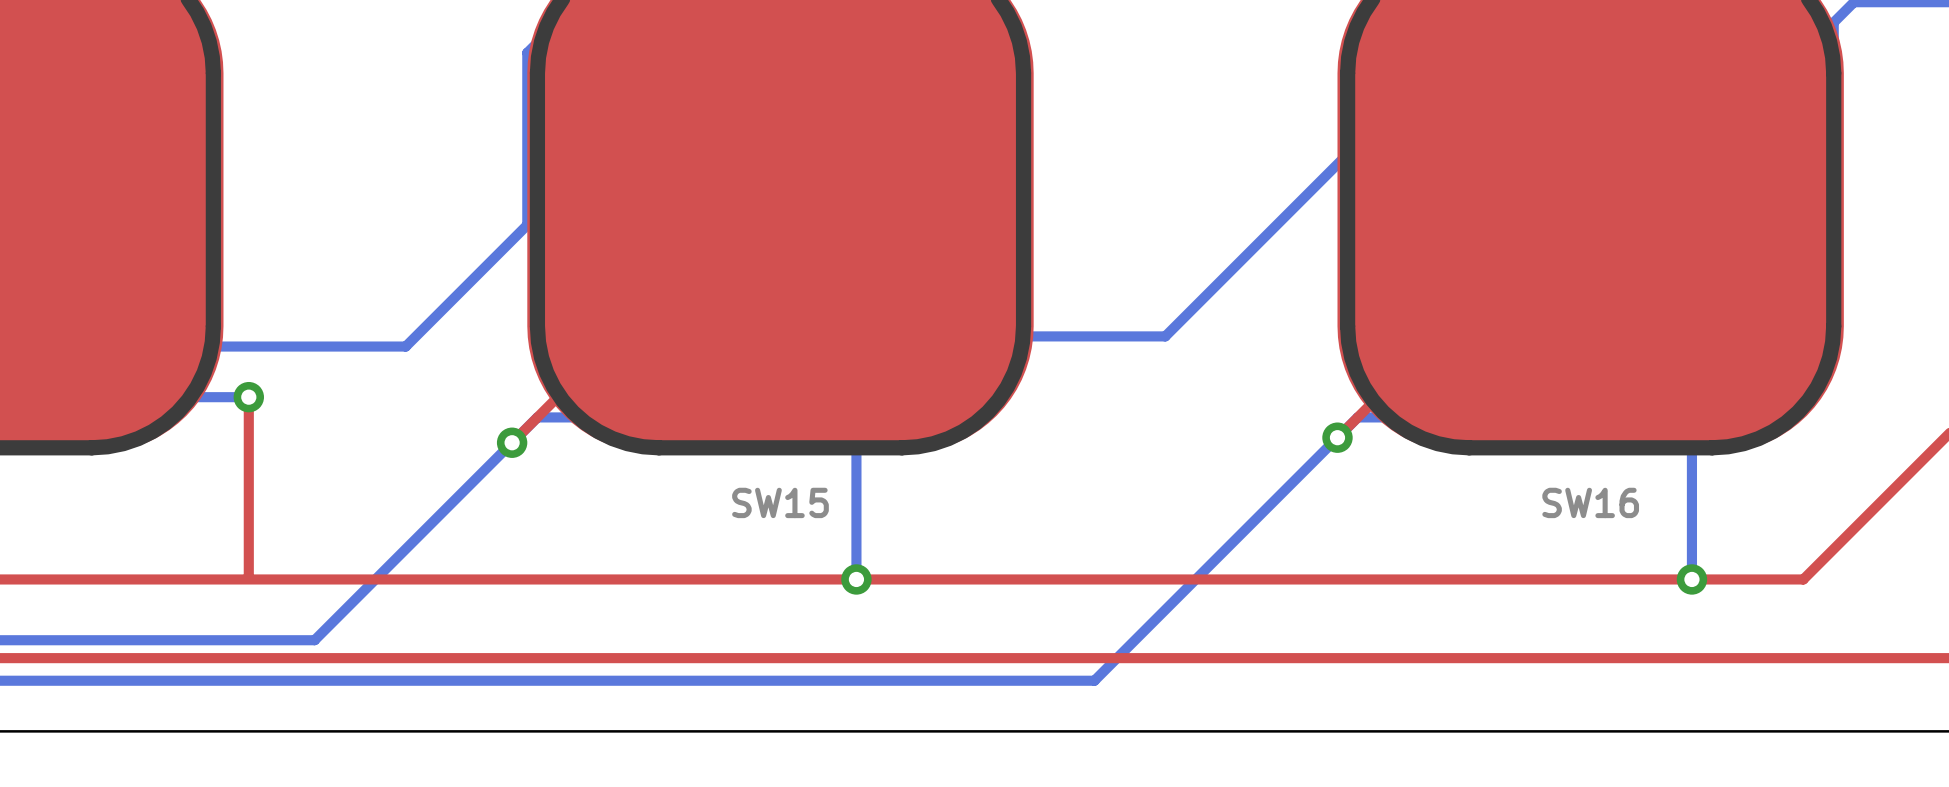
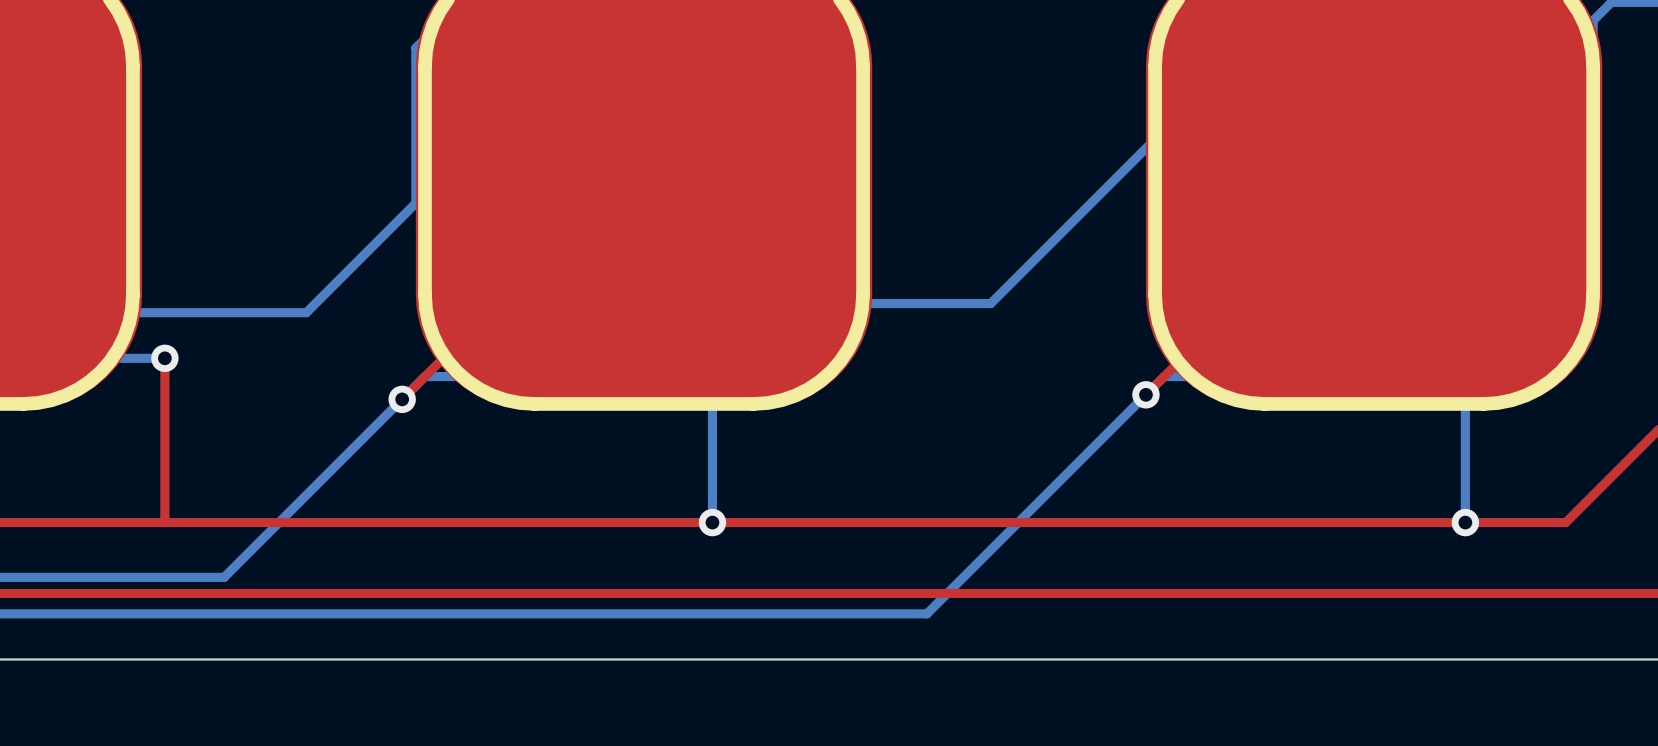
SW15 name: SW15 (780, 502) -> none
SW16 name: SW16 (1590, 502) -> none

